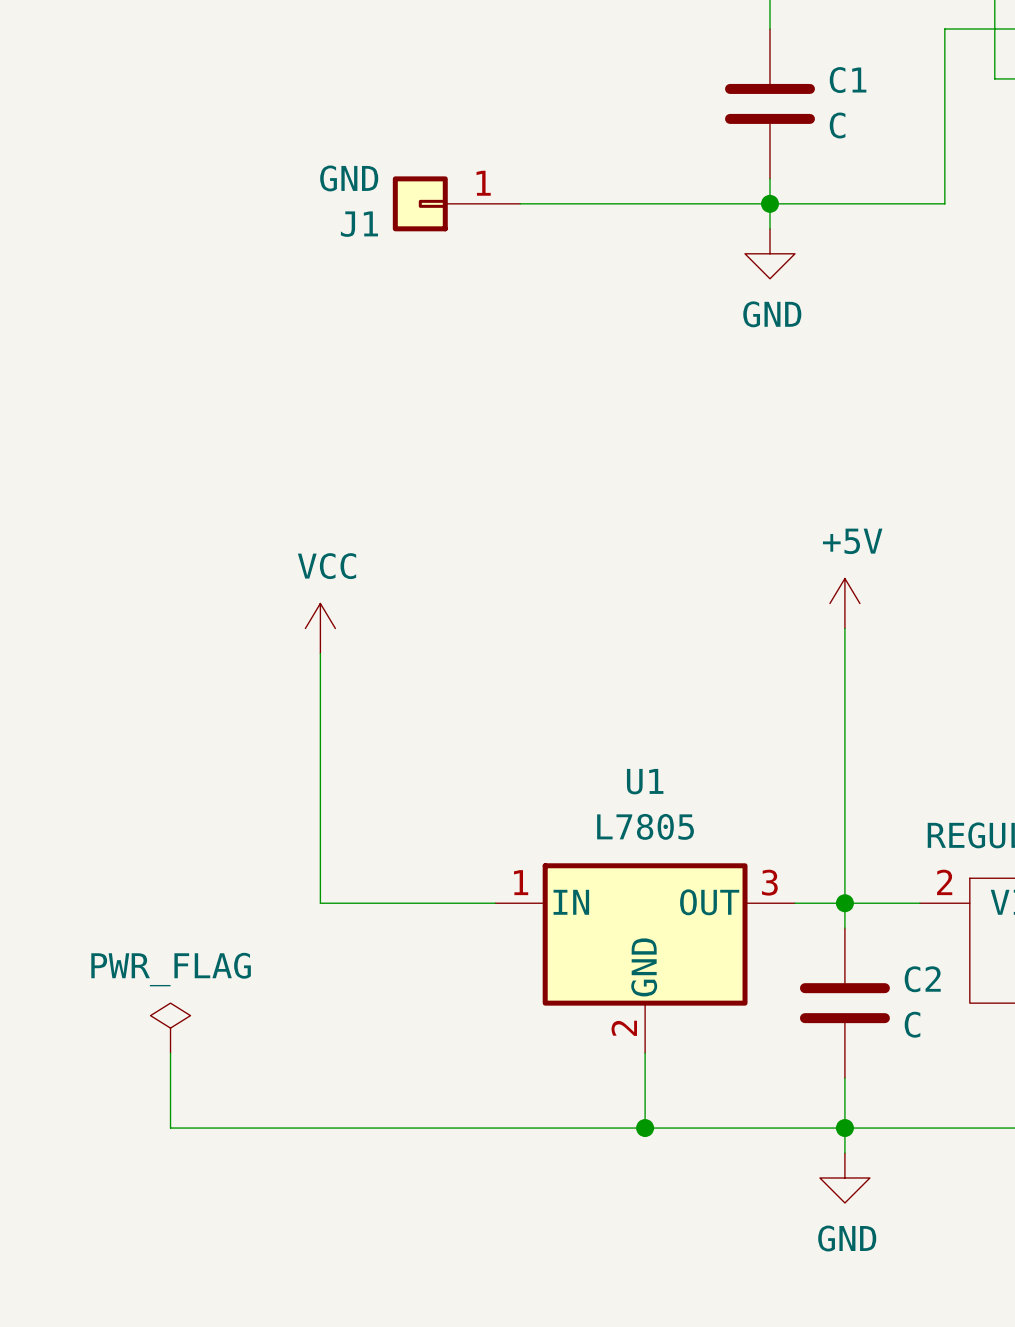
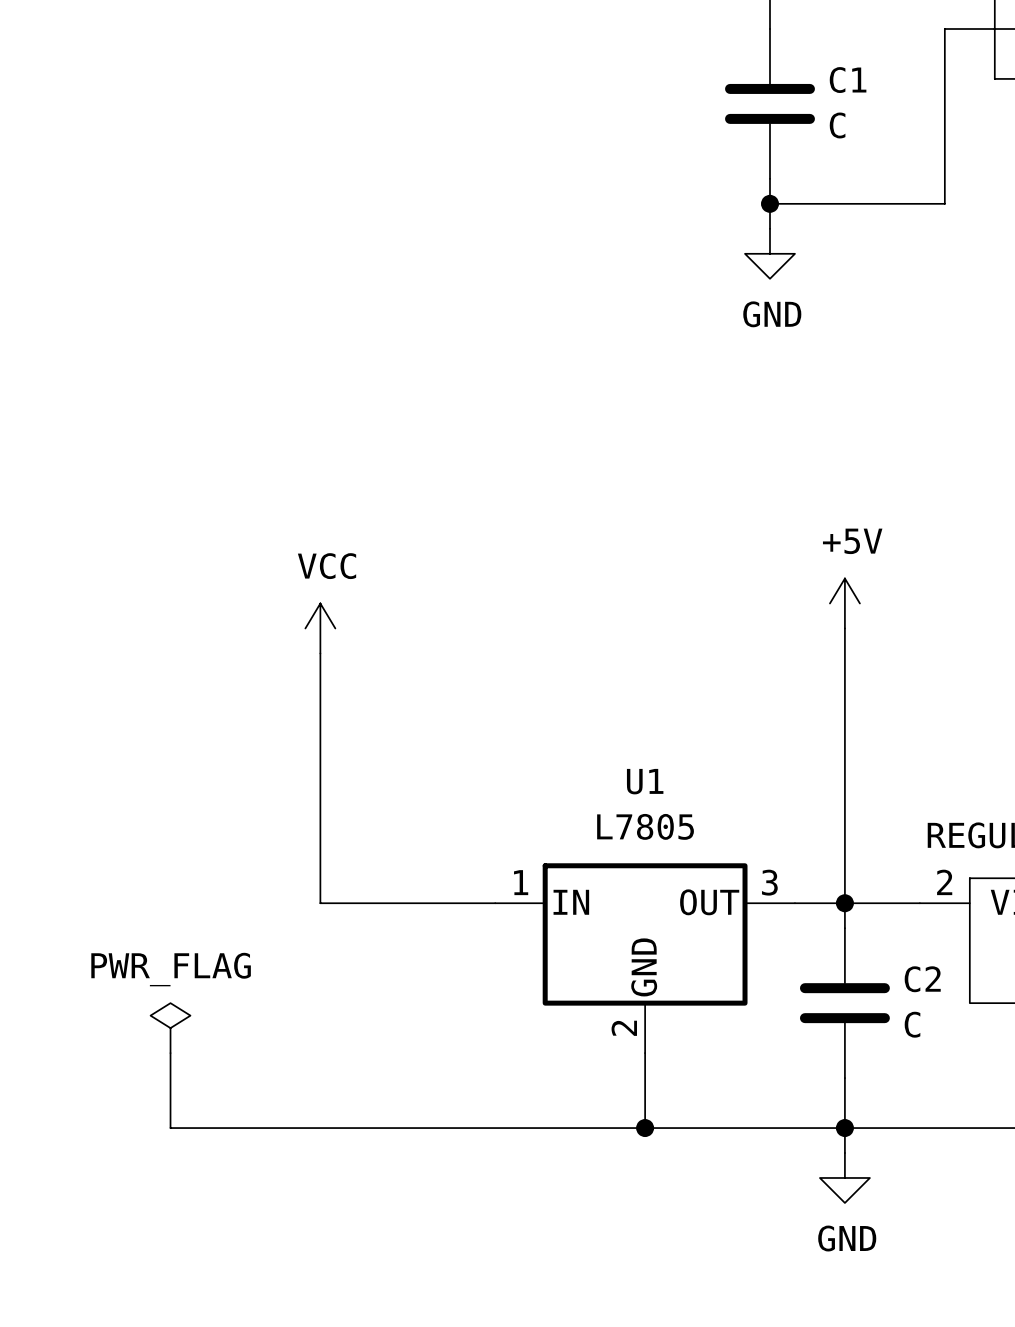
J1: GND (456, 203) -> none
wire: (520, 203) (769, 203) -> none

